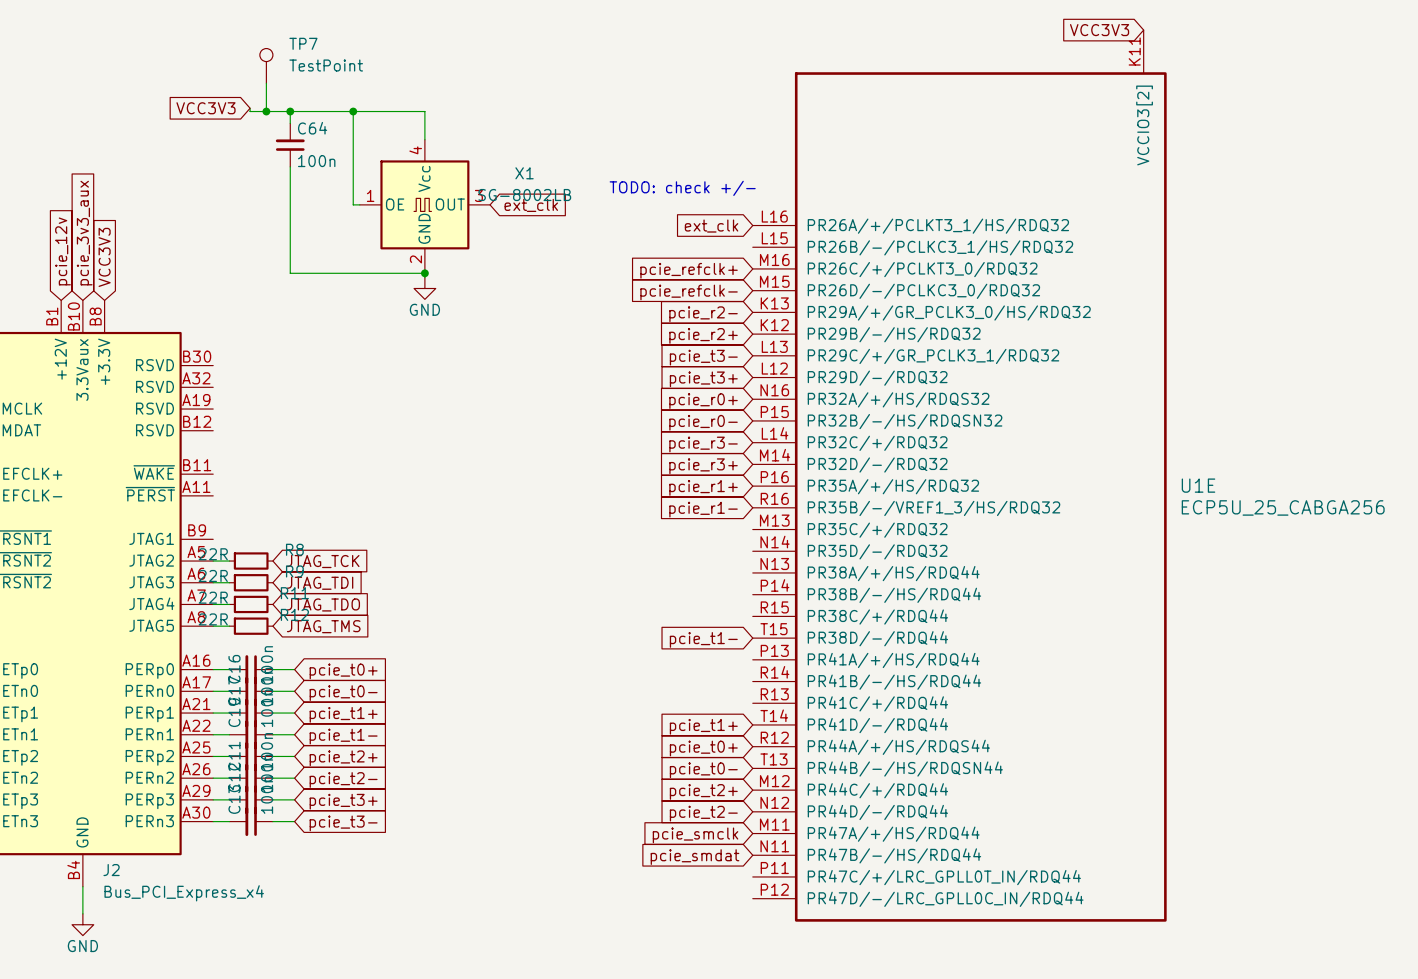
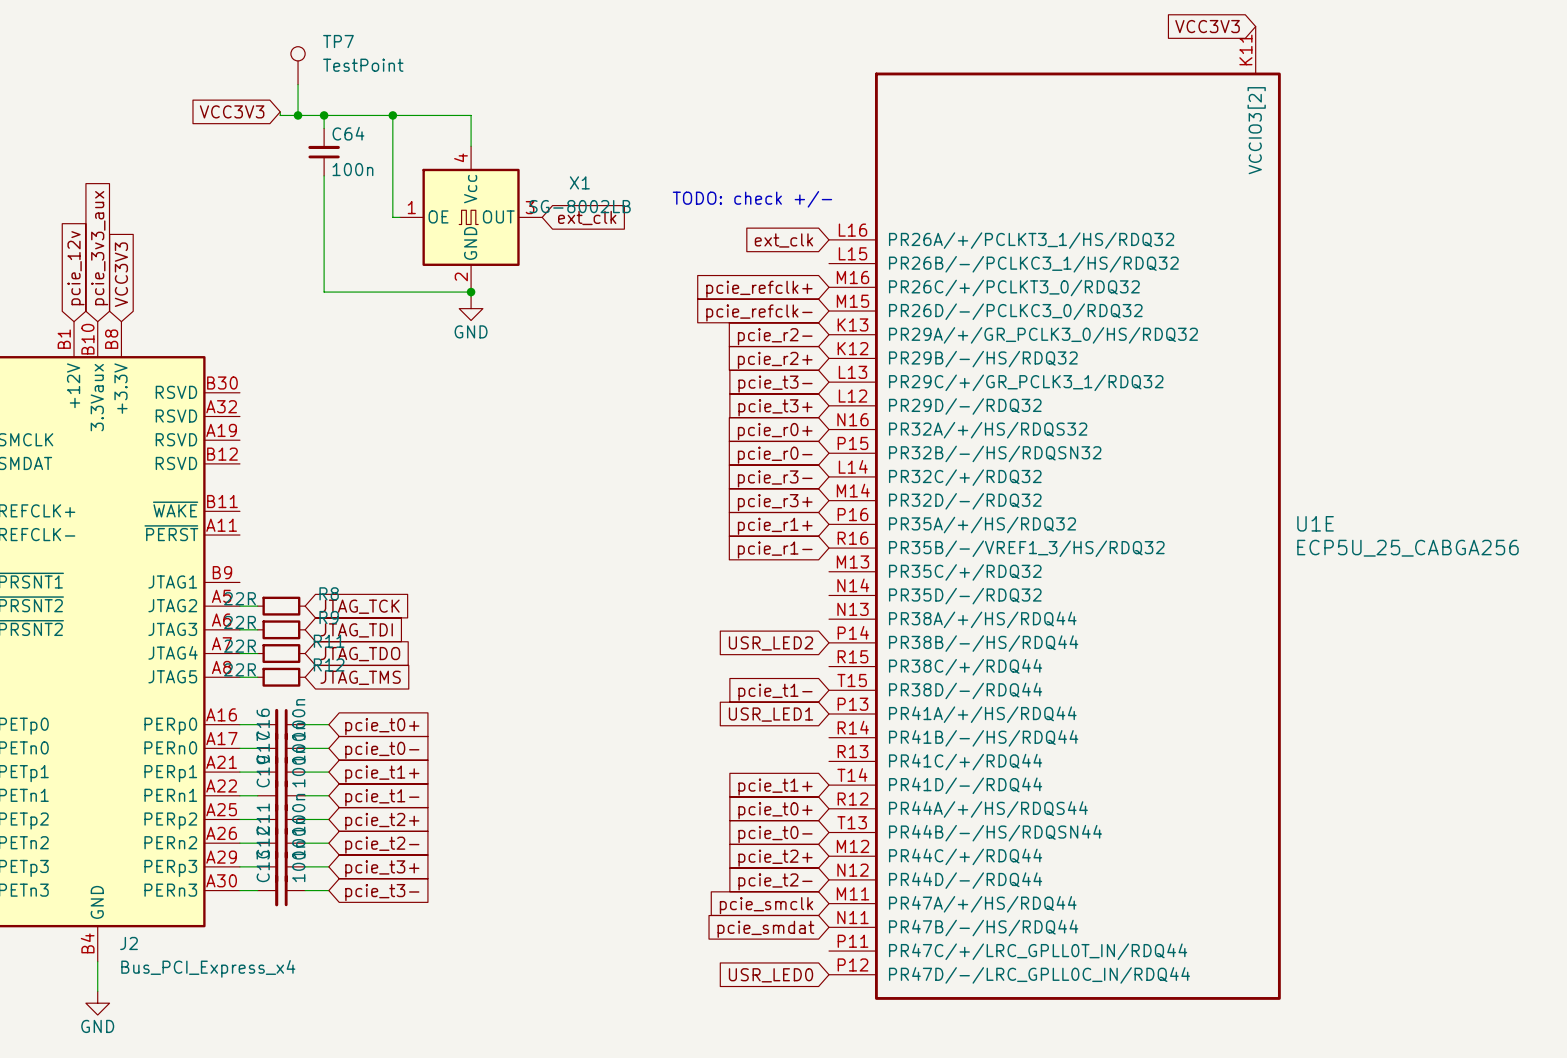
global label: none -> USR_LED2 (770, 643)
global label: none -> USR_LED1 (770, 714)
global label: none -> USR_LED0 (770, 975)

